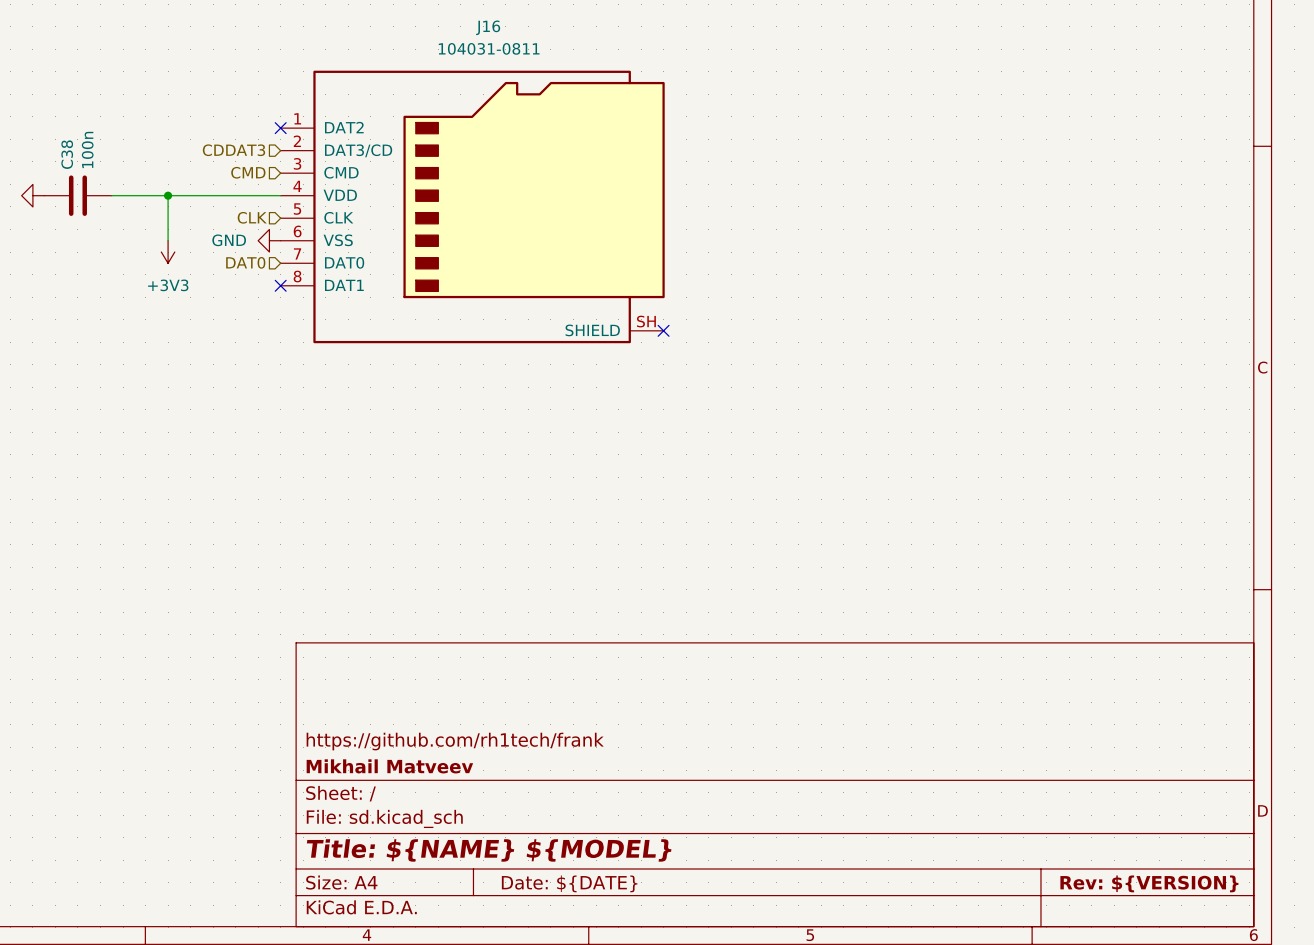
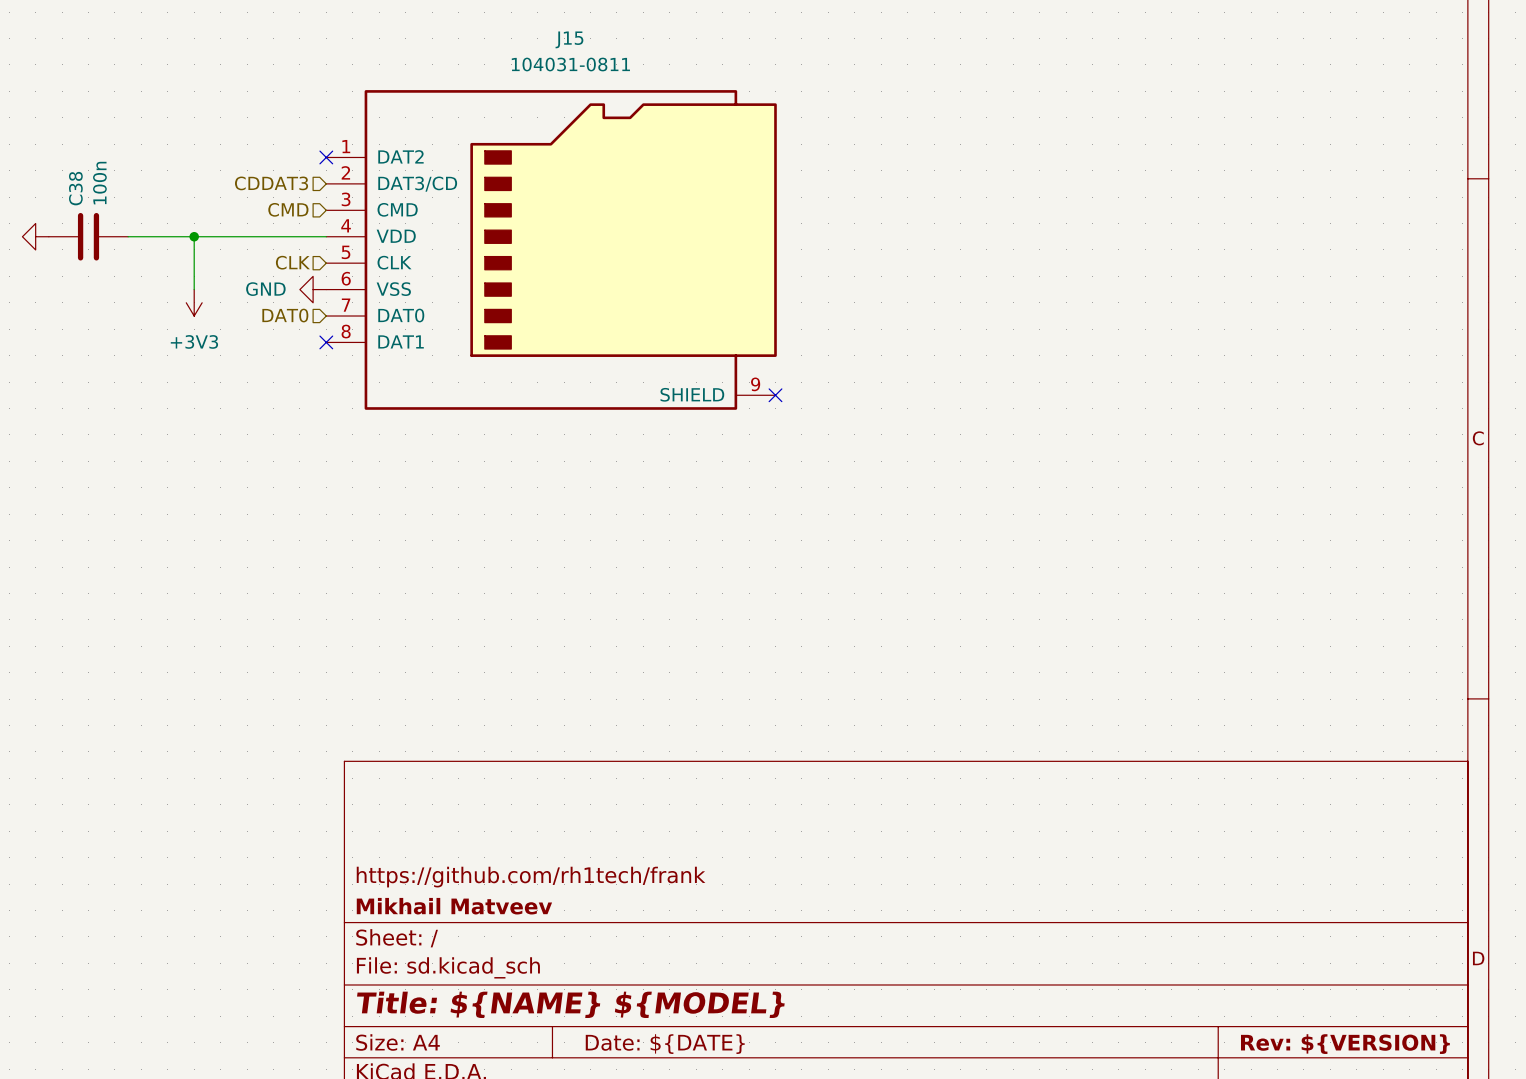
J16 name: J16 (488, 27) -> J15 (569, 39)
J16 pin number: SH (646, 321) -> 9 (755, 384)

